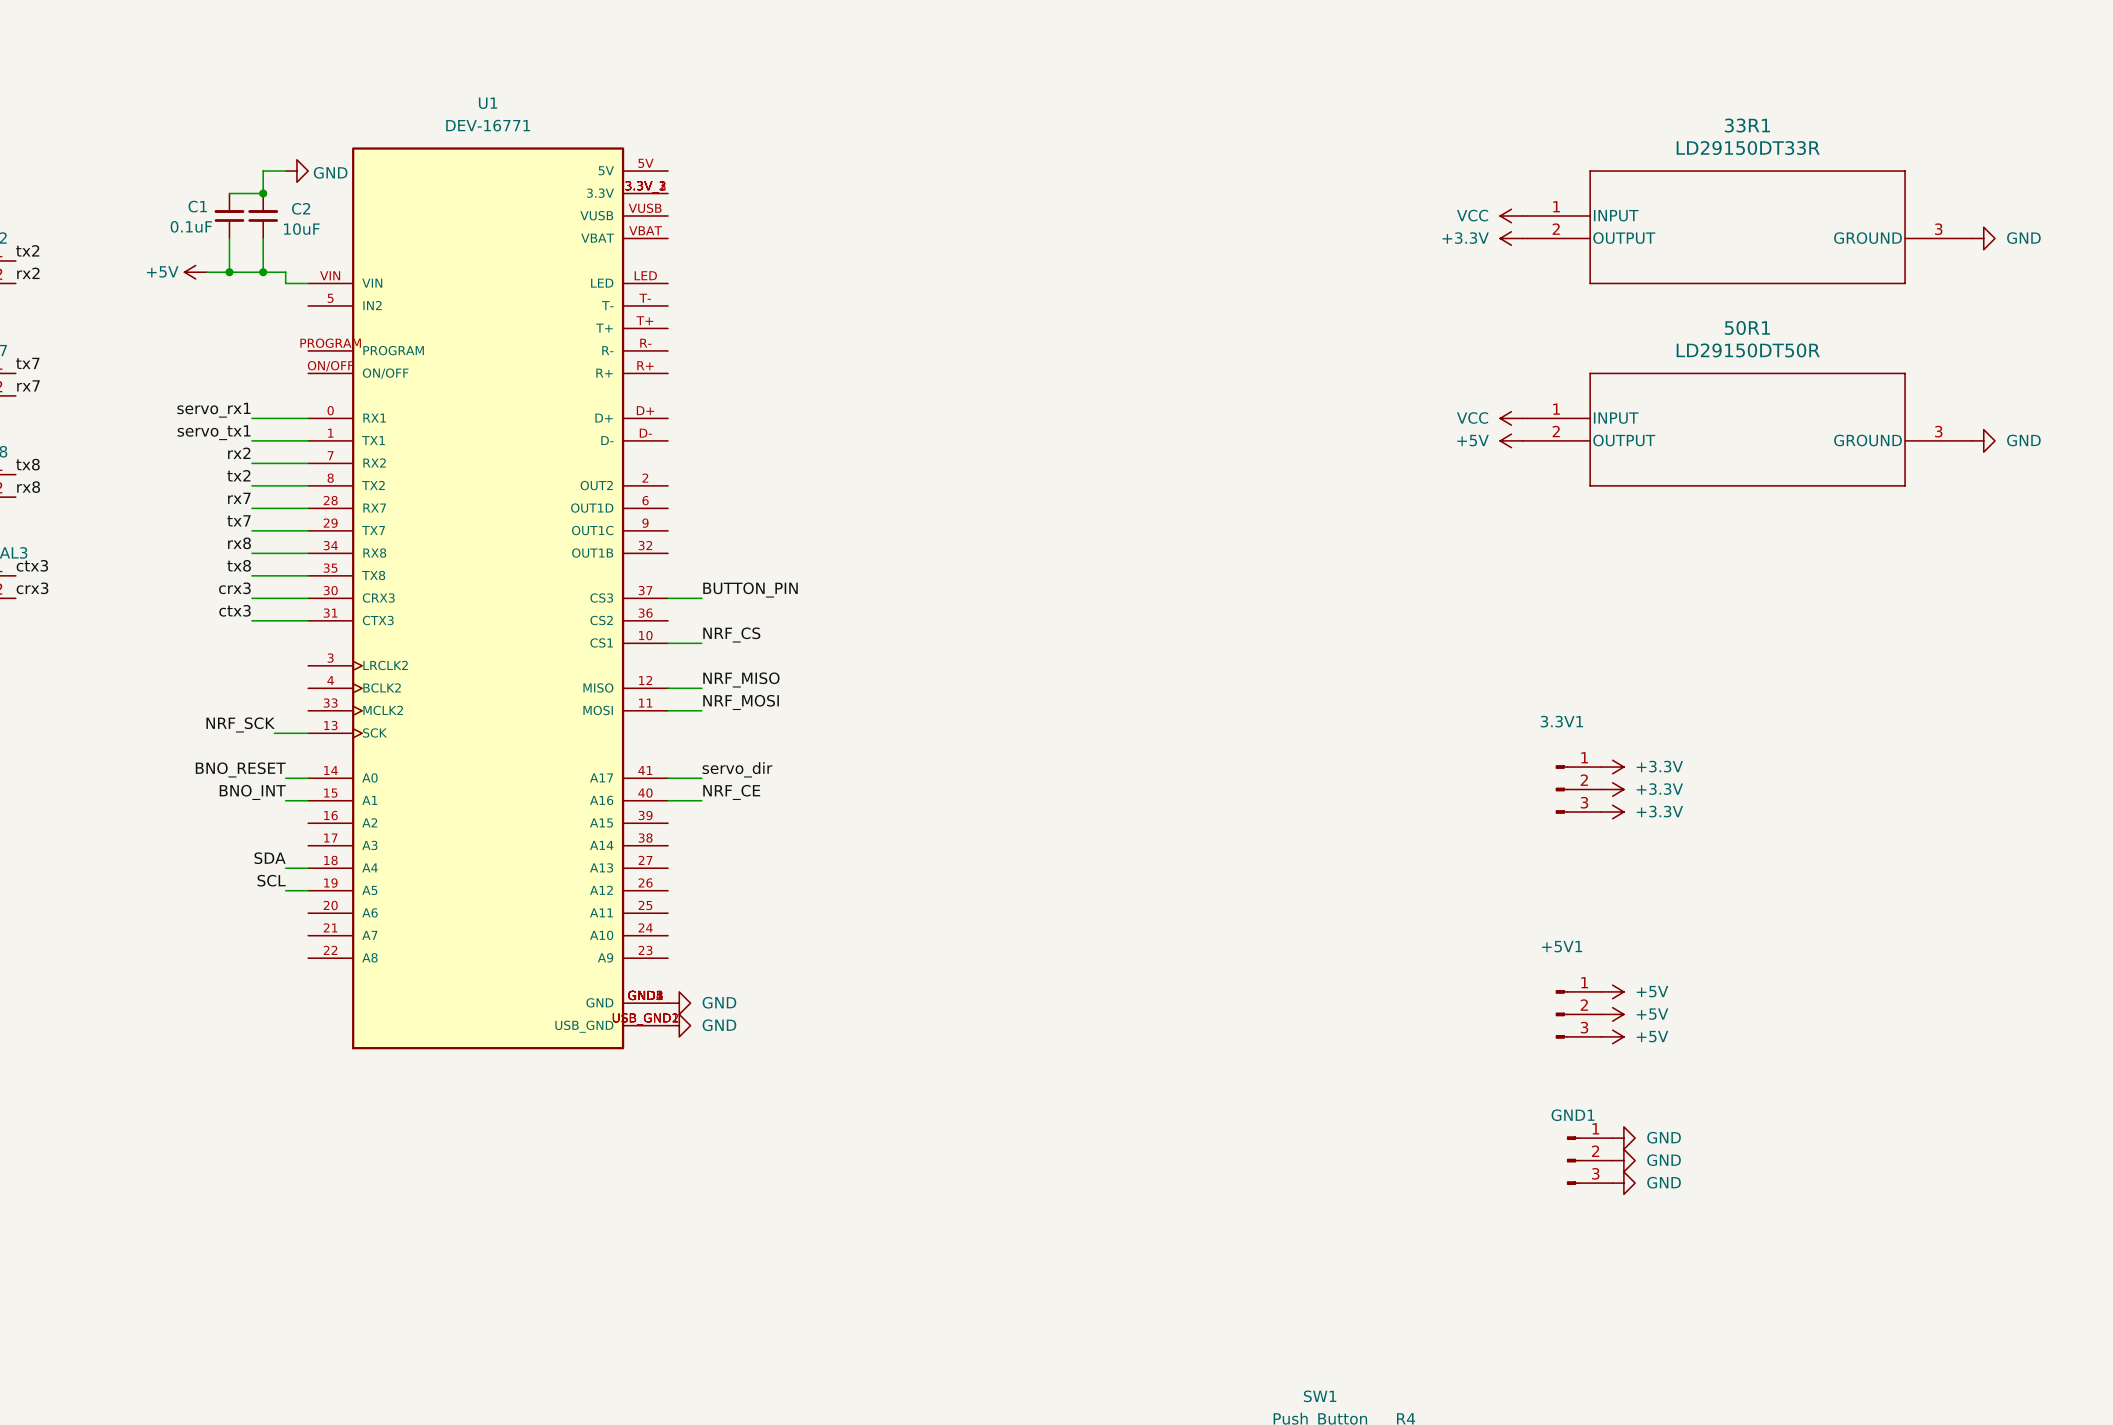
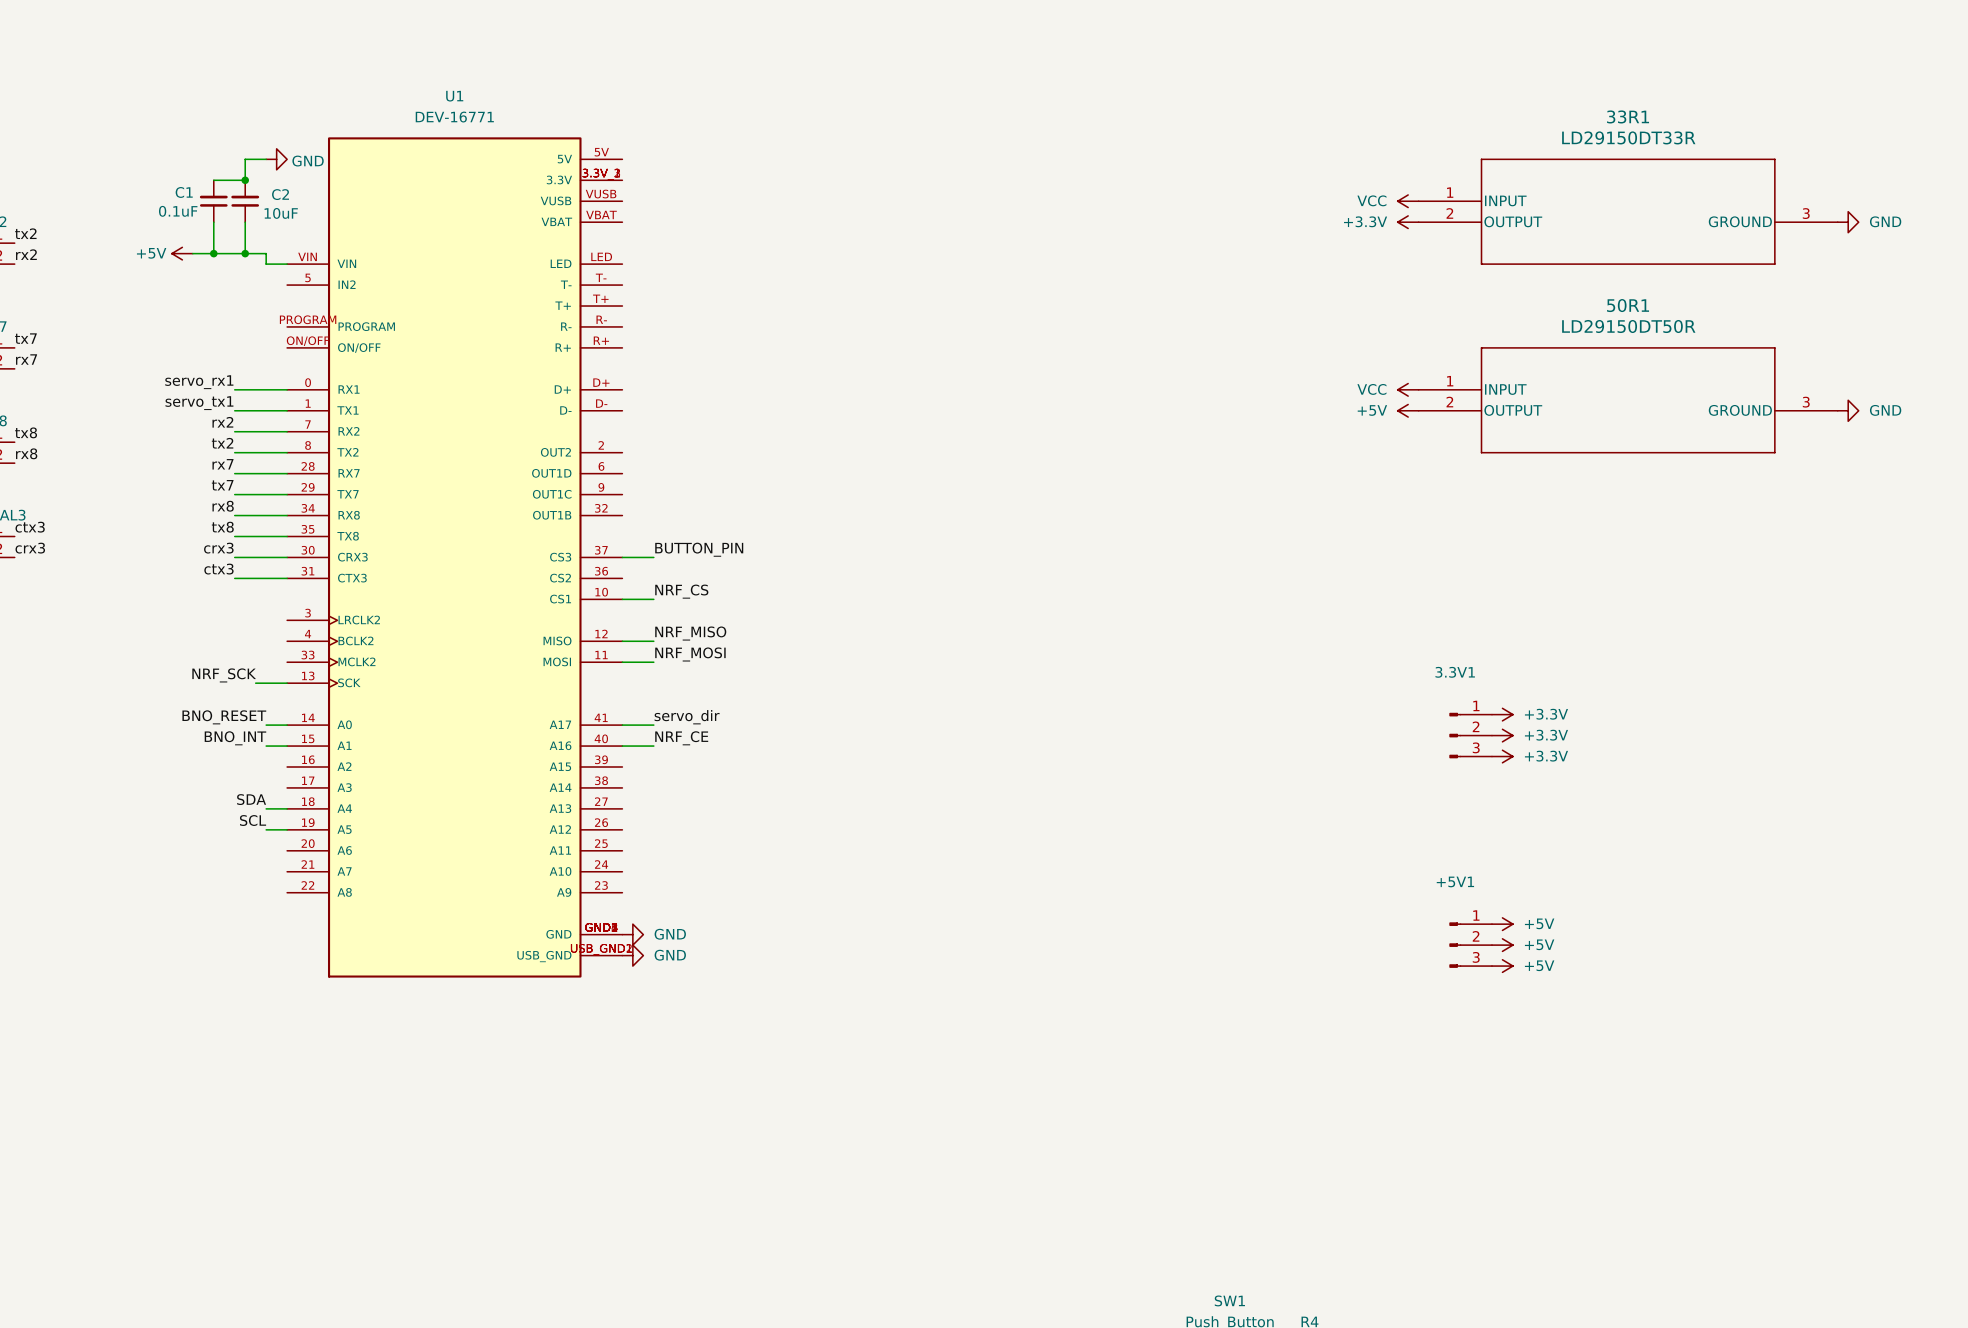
power symbol: GND (1623, 1138) -> none
GND1: (1589, 1160) -> none
power symbol: GND (1623, 1160) -> none
power symbol: GND (1623, 1183) -> none

